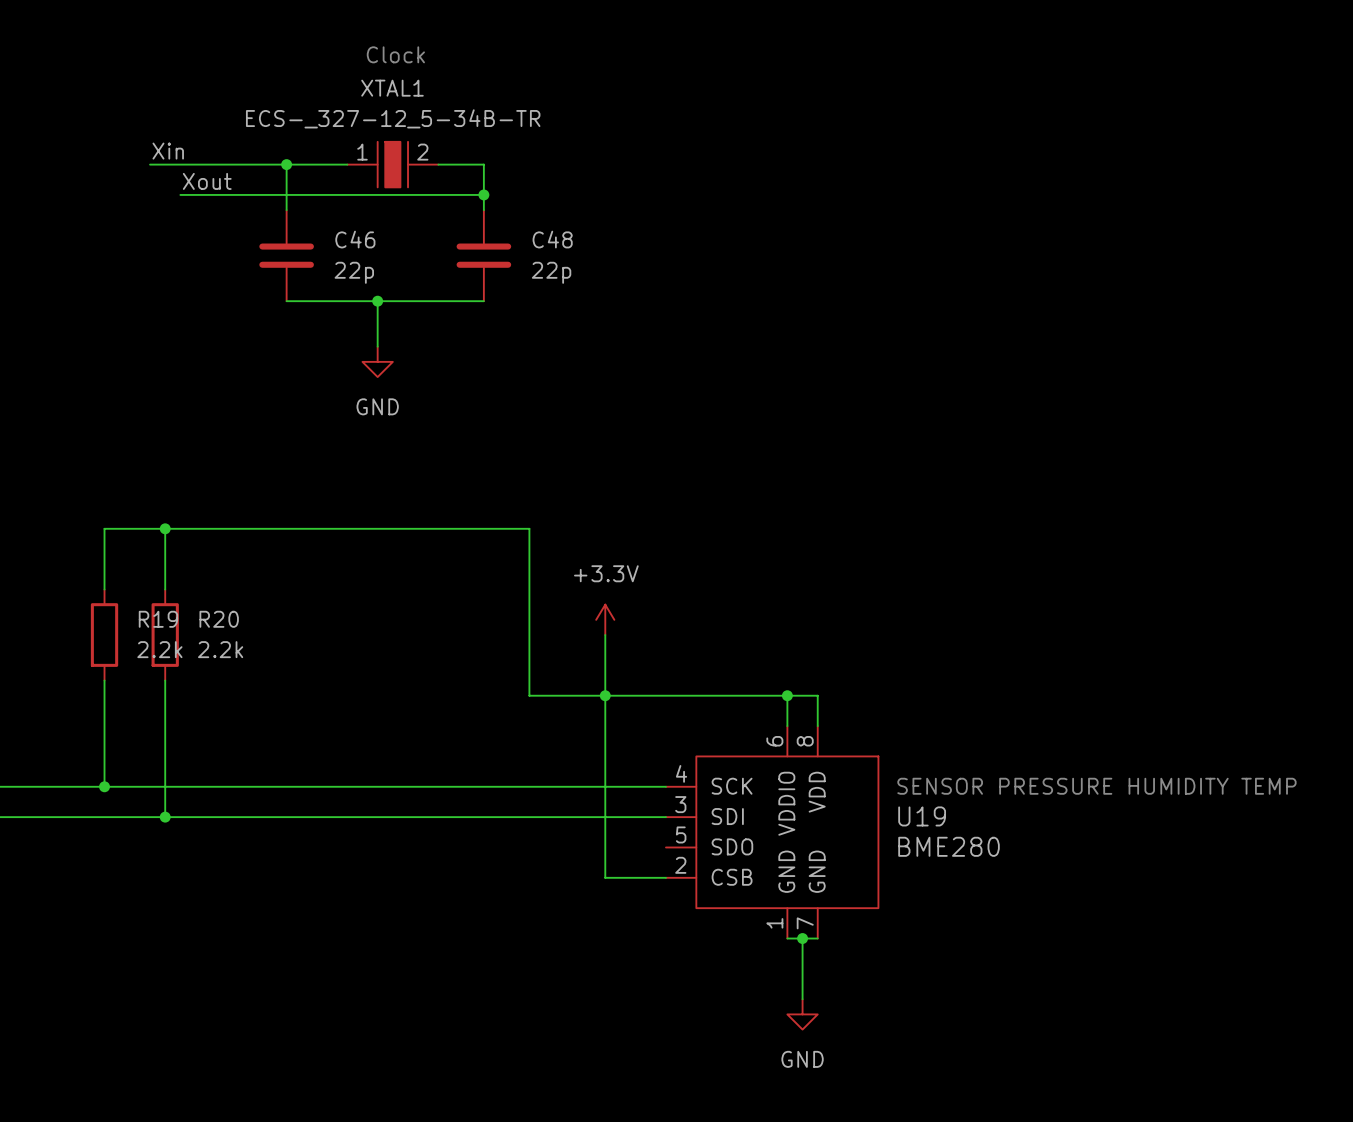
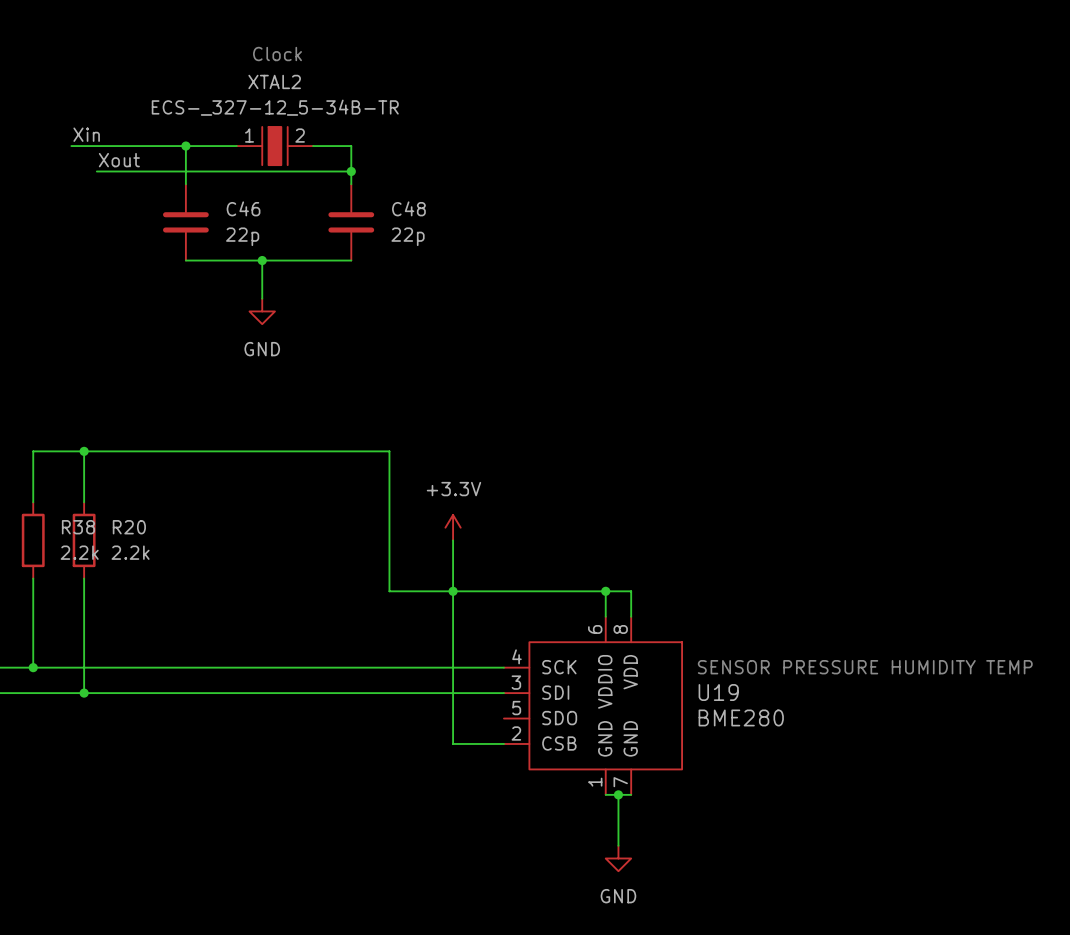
XTAL1 name: XTAL1 (392, 88) -> XTAL2 (274, 81)
R19 name: R19 (158, 619) -> R38 (78, 527)

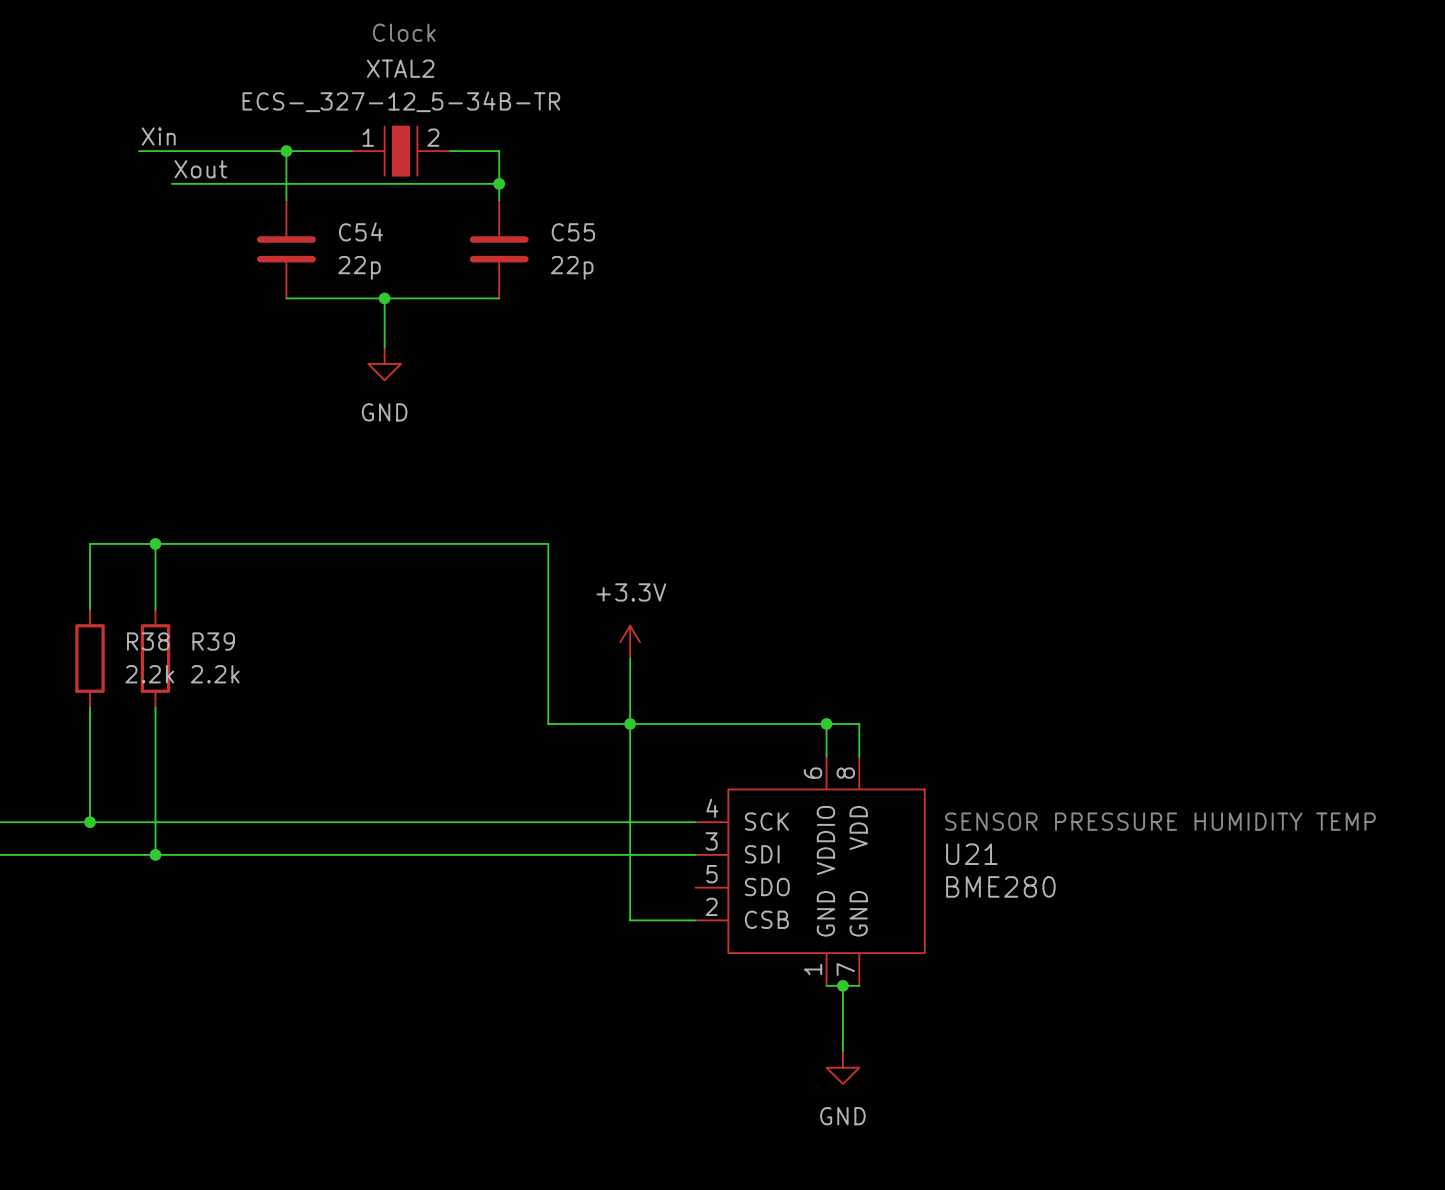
C46 name: C46 (243, 208) -> C54 (360, 231)
C48 name: C48 (408, 208) -> C55 (573, 232)
R20 name: R20 (129, 527) -> R39 (213, 641)
U19 name: U19 (718, 692) -> U21 (971, 854)

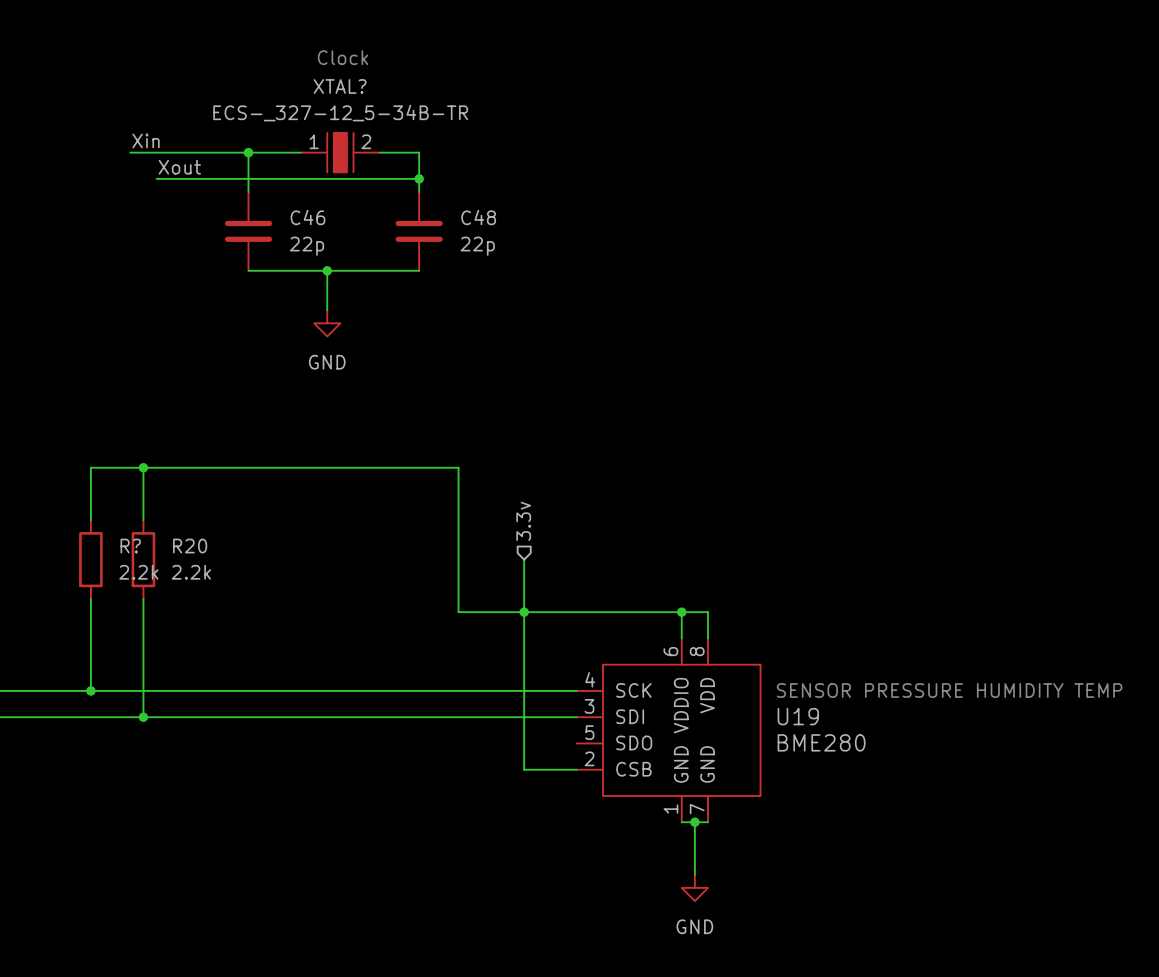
XTAL2 name: XTAL2 (400, 68) -> XTAL? (340, 86)
C54 name: C54 (360, 231) -> C46 (307, 217)
C55 name: C55 (573, 232) -> C48 (478, 217)
hierarchical label: none -> 3.3v (523, 521)
R38 name: R38 (148, 641) -> R? (130, 546)
R39 name: R39 (213, 641) -> R20 (190, 546)
power symbol: +3.3V (630, 642) -> none
U21 name: U21 (971, 854) -> U19 (798, 716)

